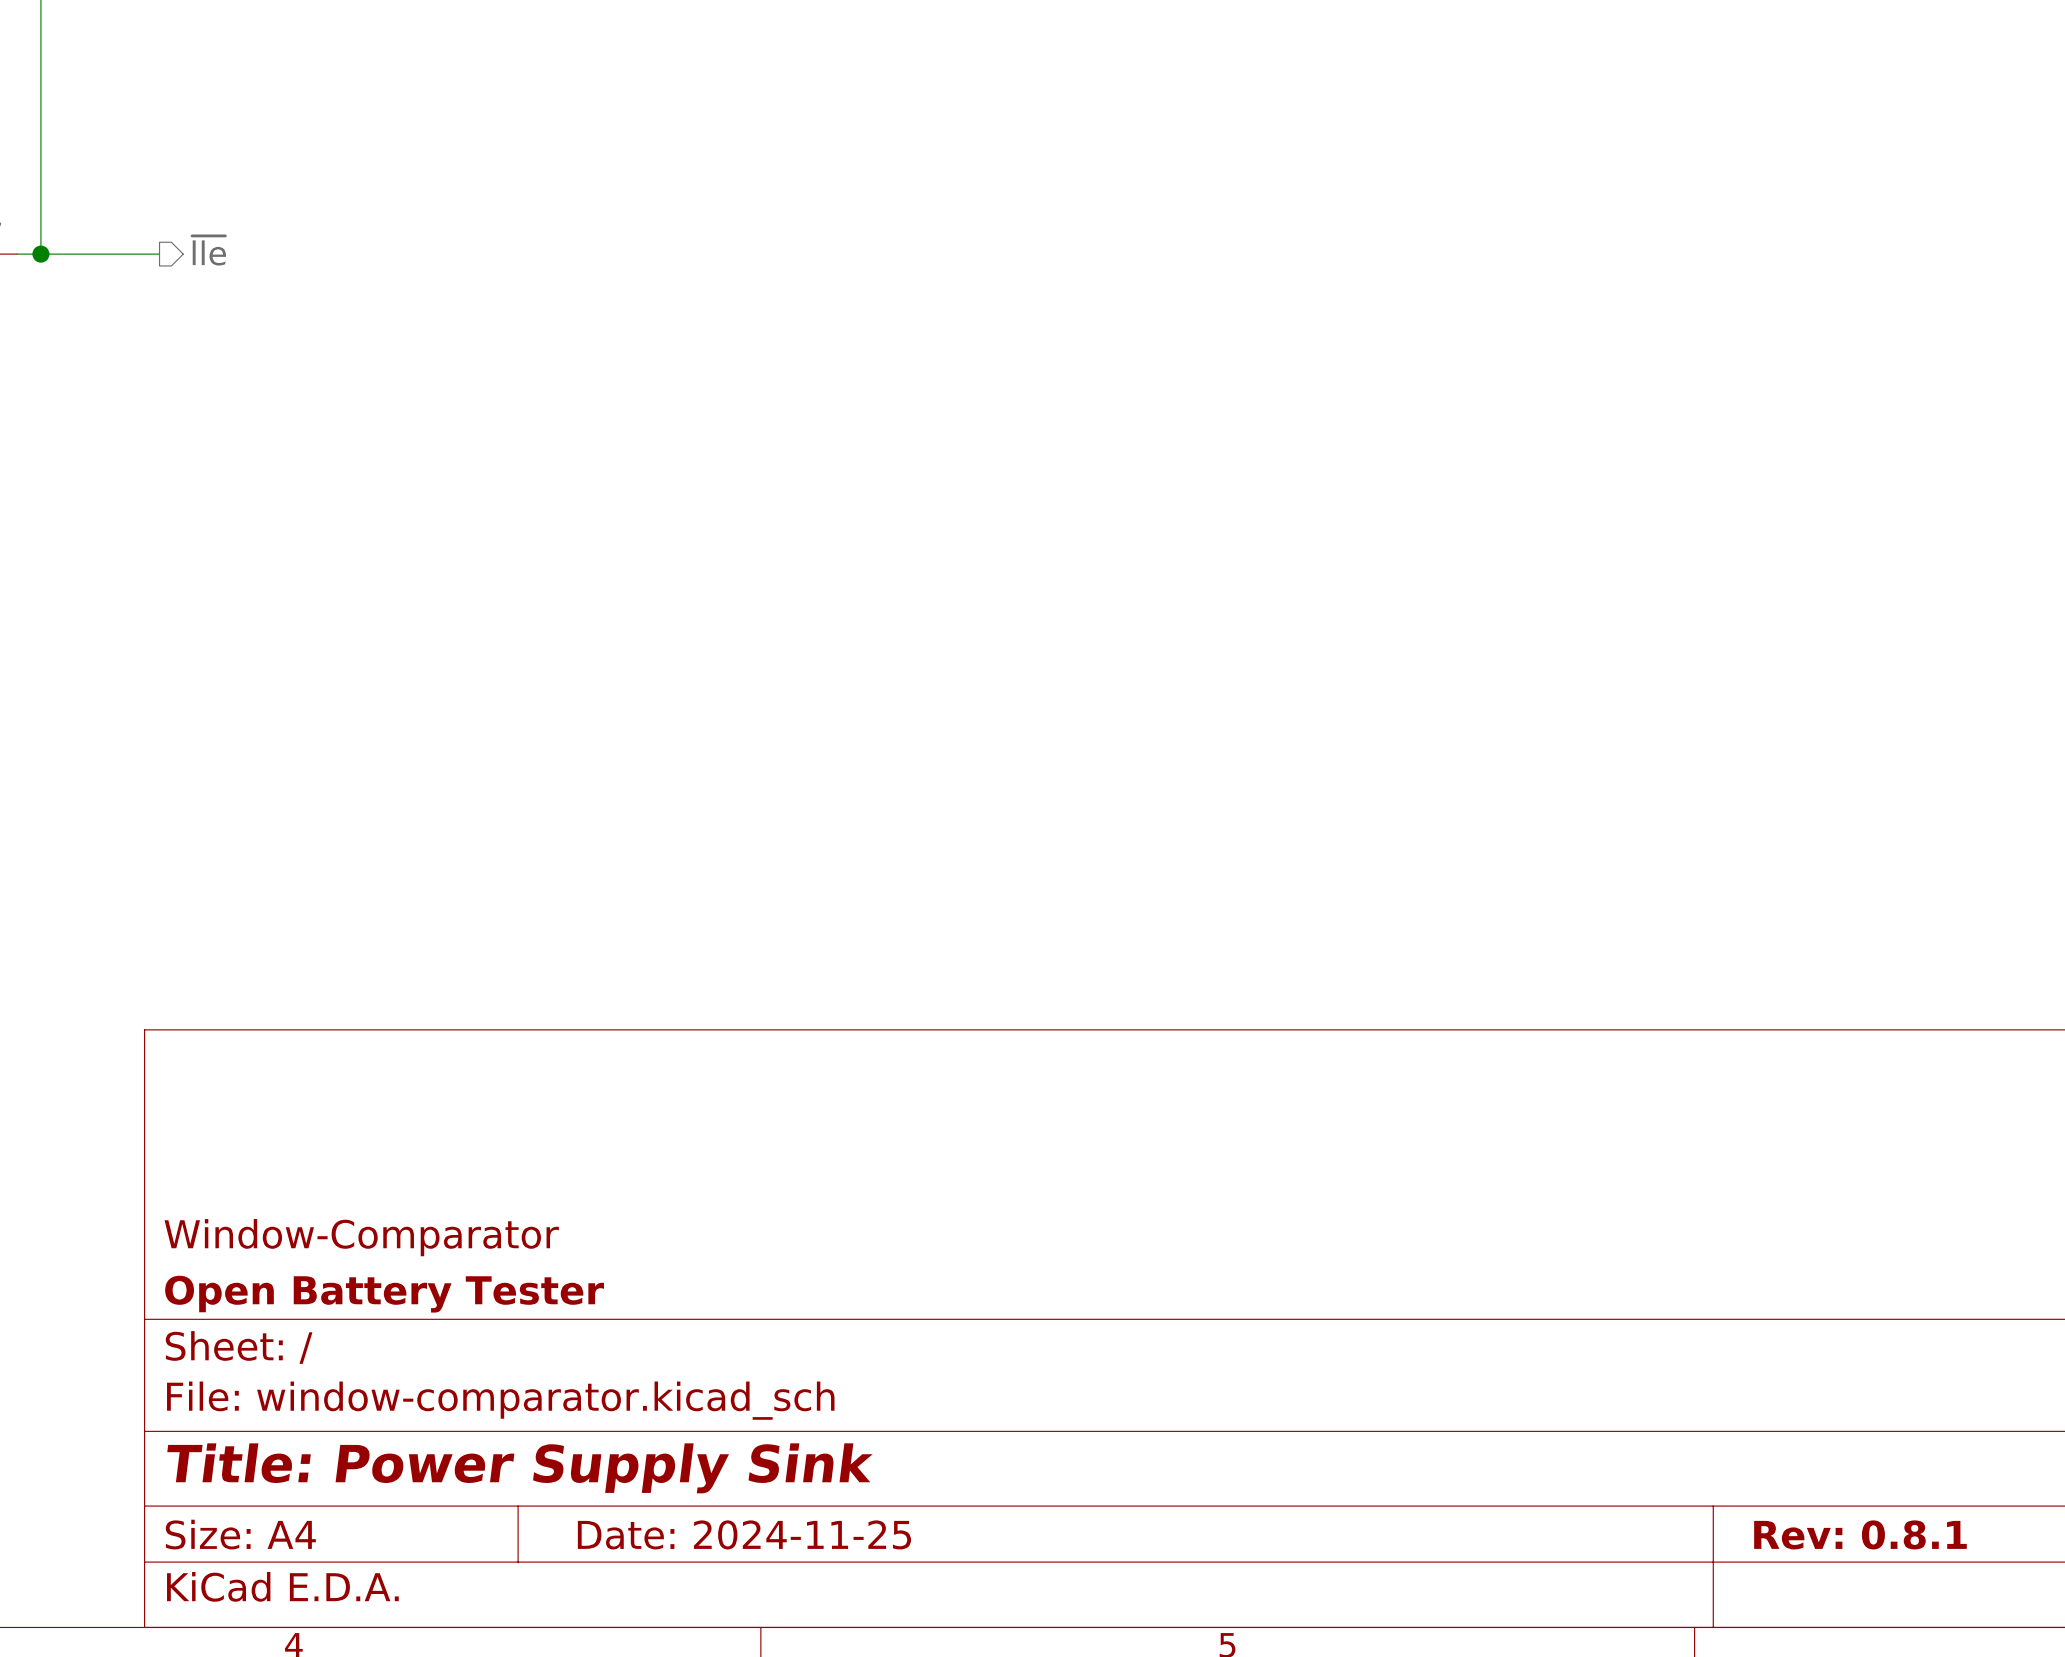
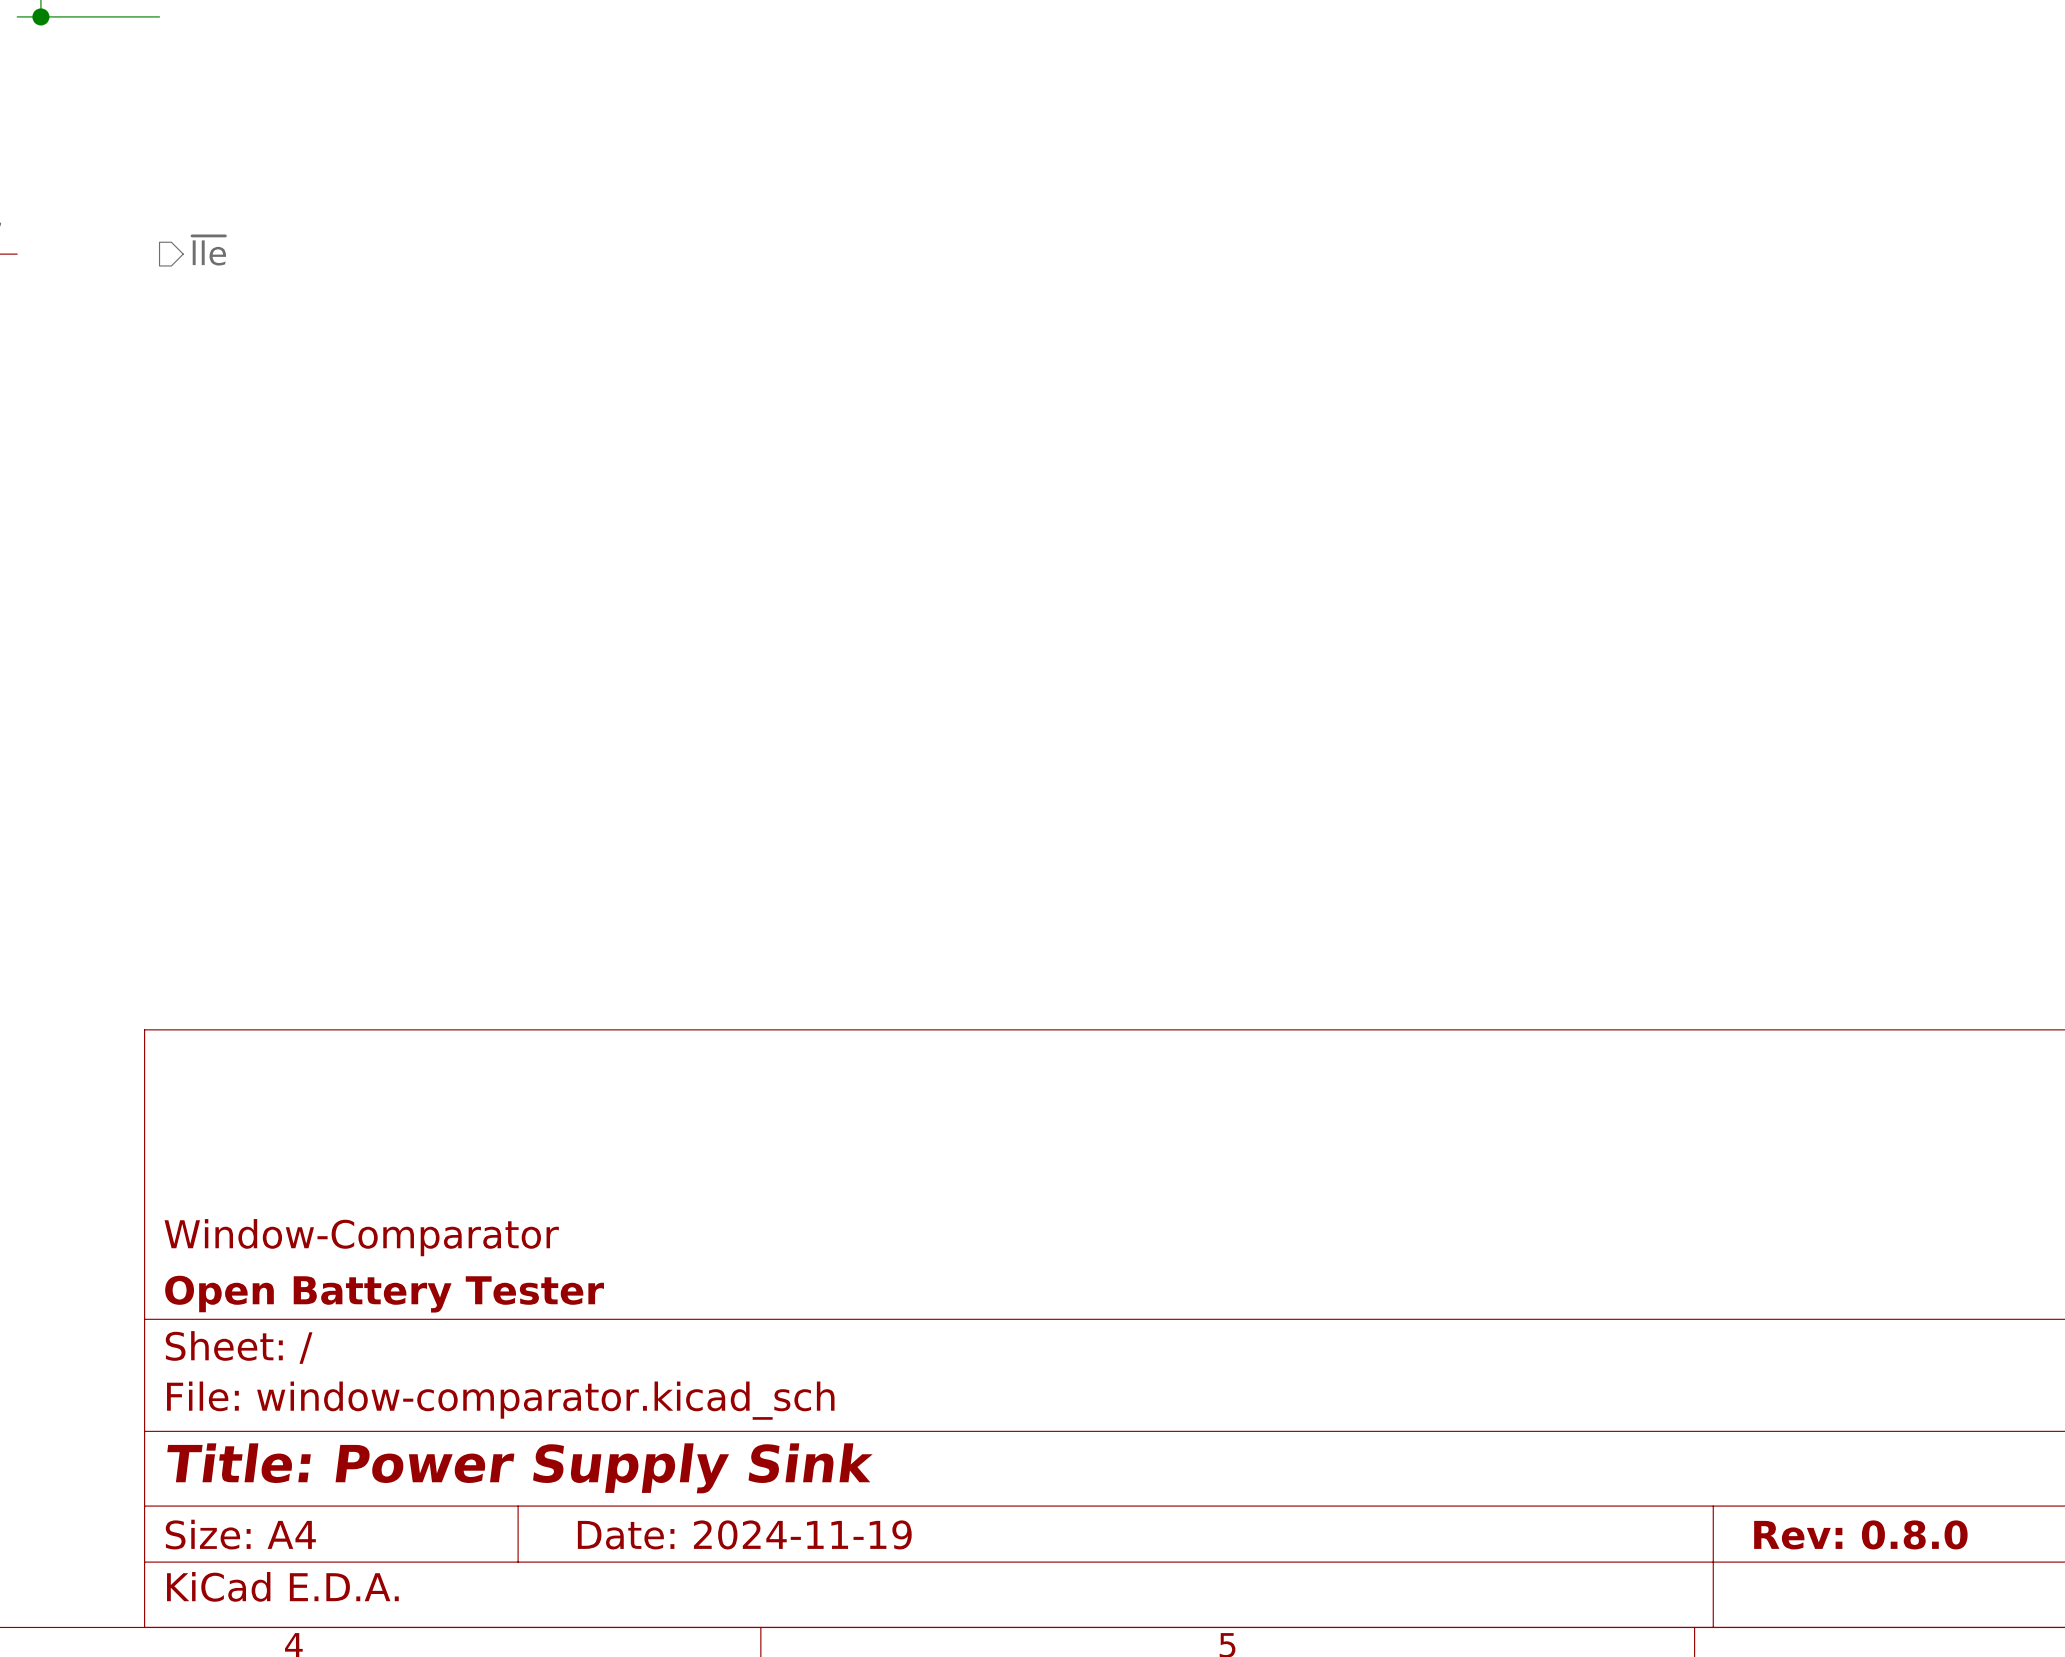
wire: (40, 16) (40, 254) -> none
junction: none -> (40, 16)
wire: (17, 254) (159, 254) -> (17, 16) (159, 16)
junction: (40, 254) -> none
title block: Date: 2024-11-25 (744, 1534) -> Date: 2024-11-19 (744, 1534)
title block: Rev: 0.8.1 (1860, 1534) -> Rev: 0.8.0 (1860, 1534)

